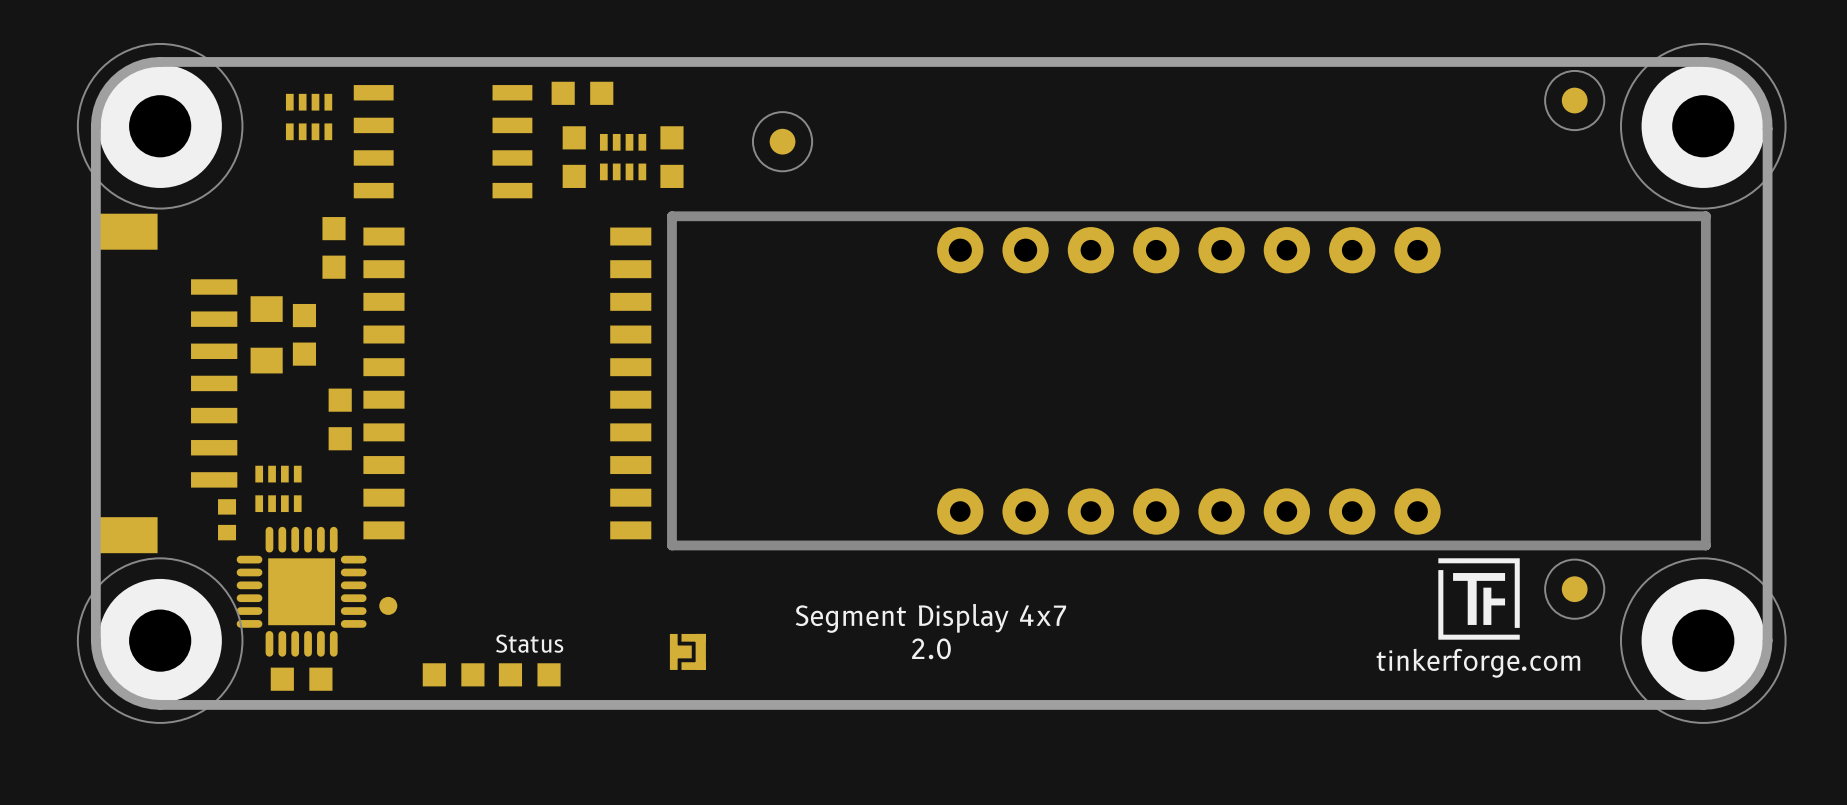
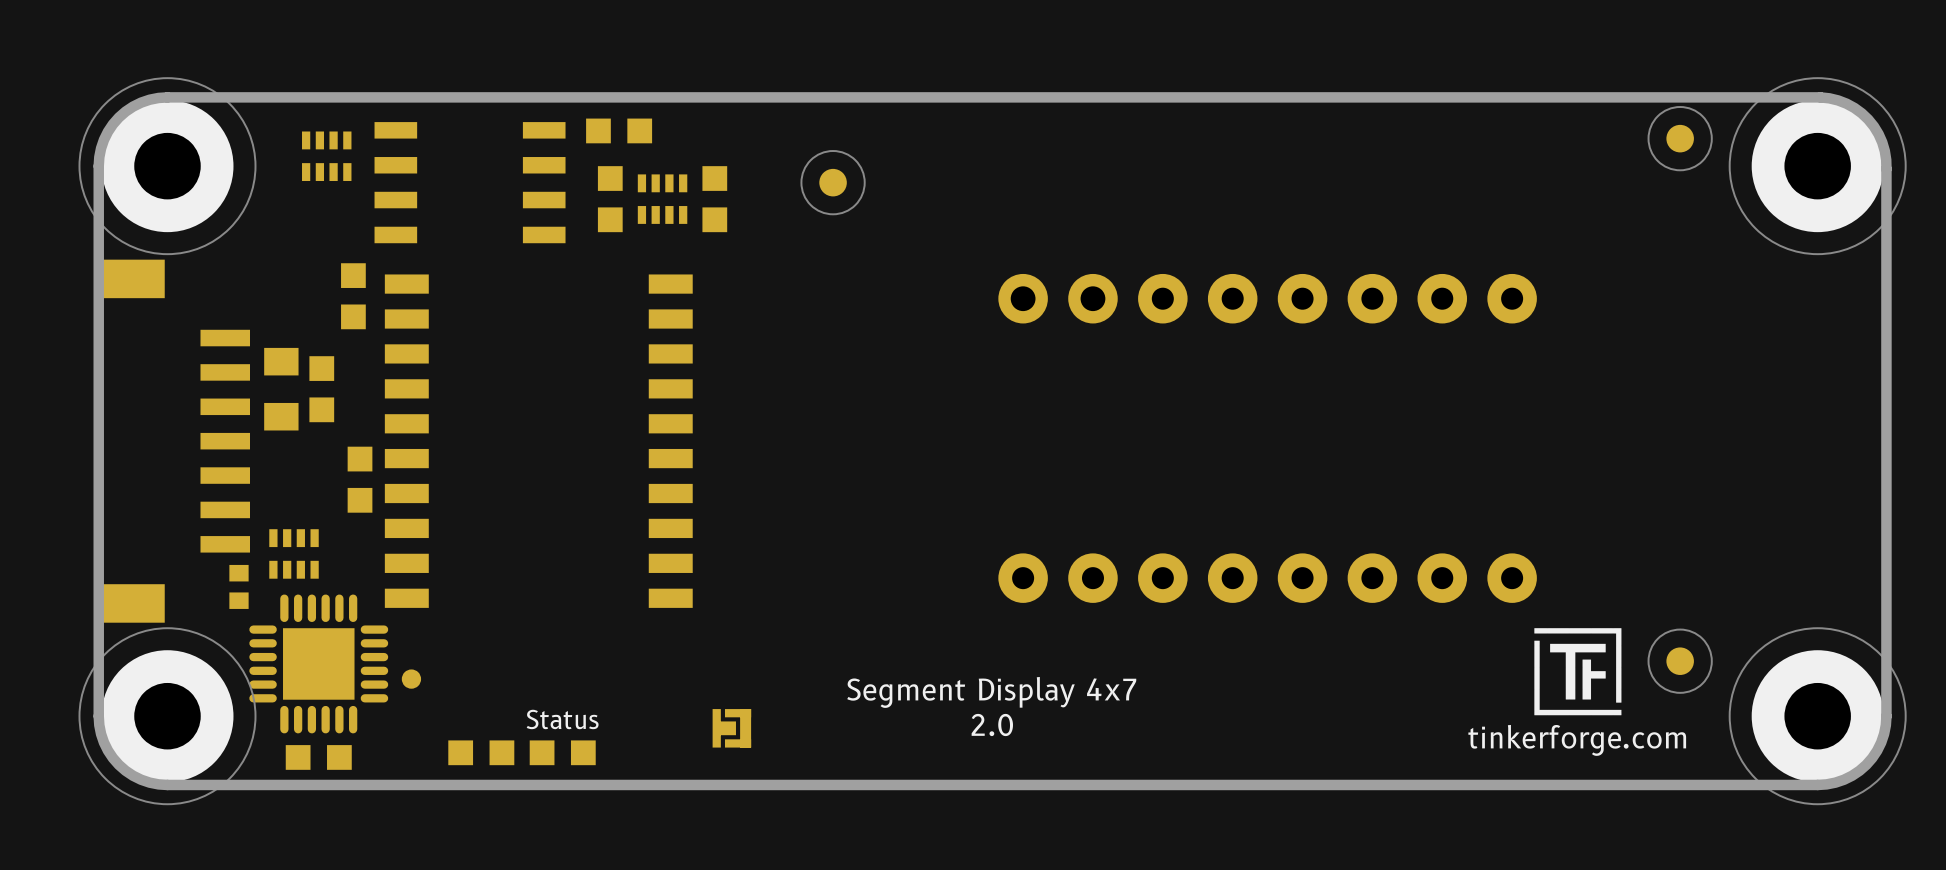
line: (671, 216) (671, 545) (1705, 545) (1705, 216) (671, 216) -> none

